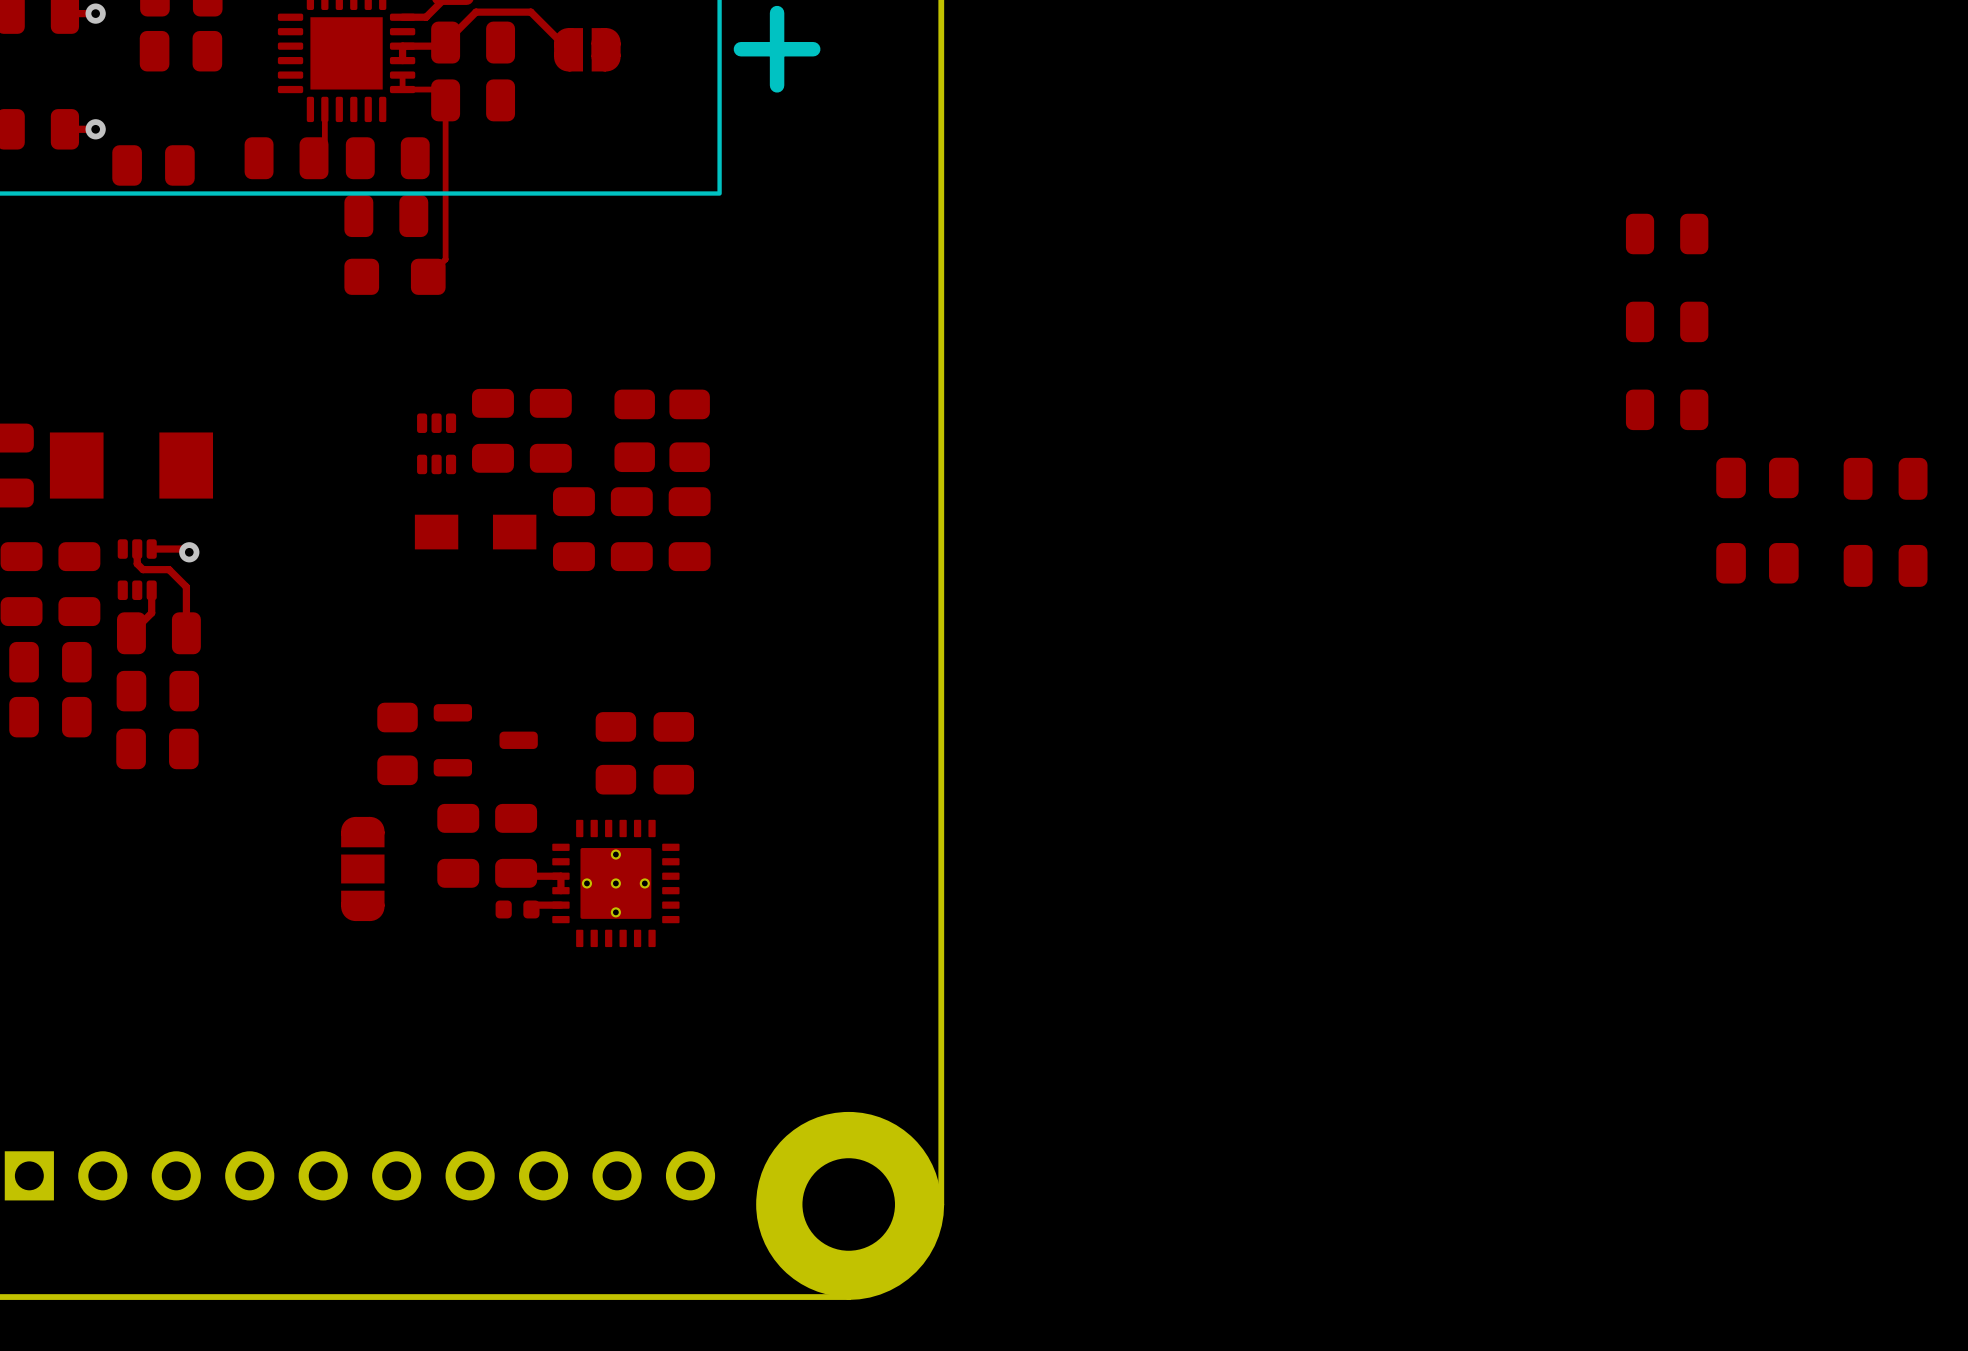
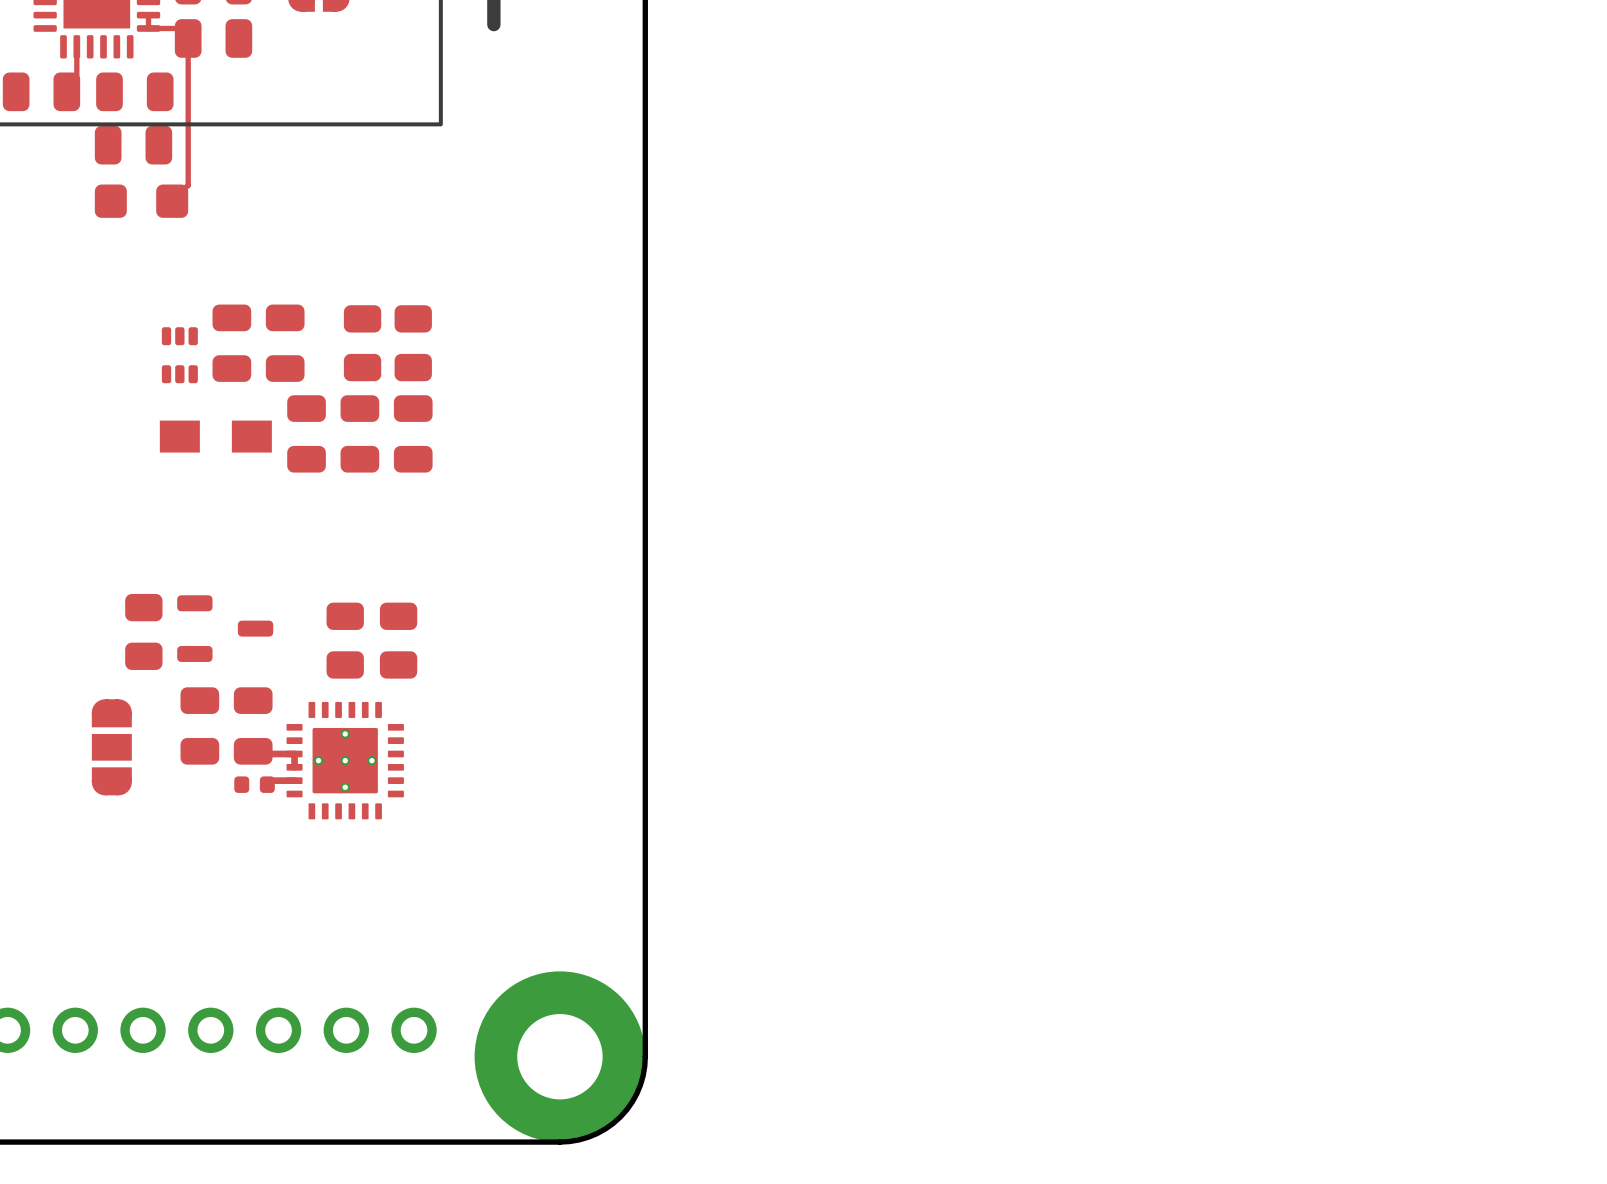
part: (1667, 234) -> none
part: (1667, 321) -> none
part: (1667, 409) -> none
part: (1757, 477) -> none
part: (1885, 478) -> none
part: (1757, 563) -> none
part: (1885, 565) -> none

